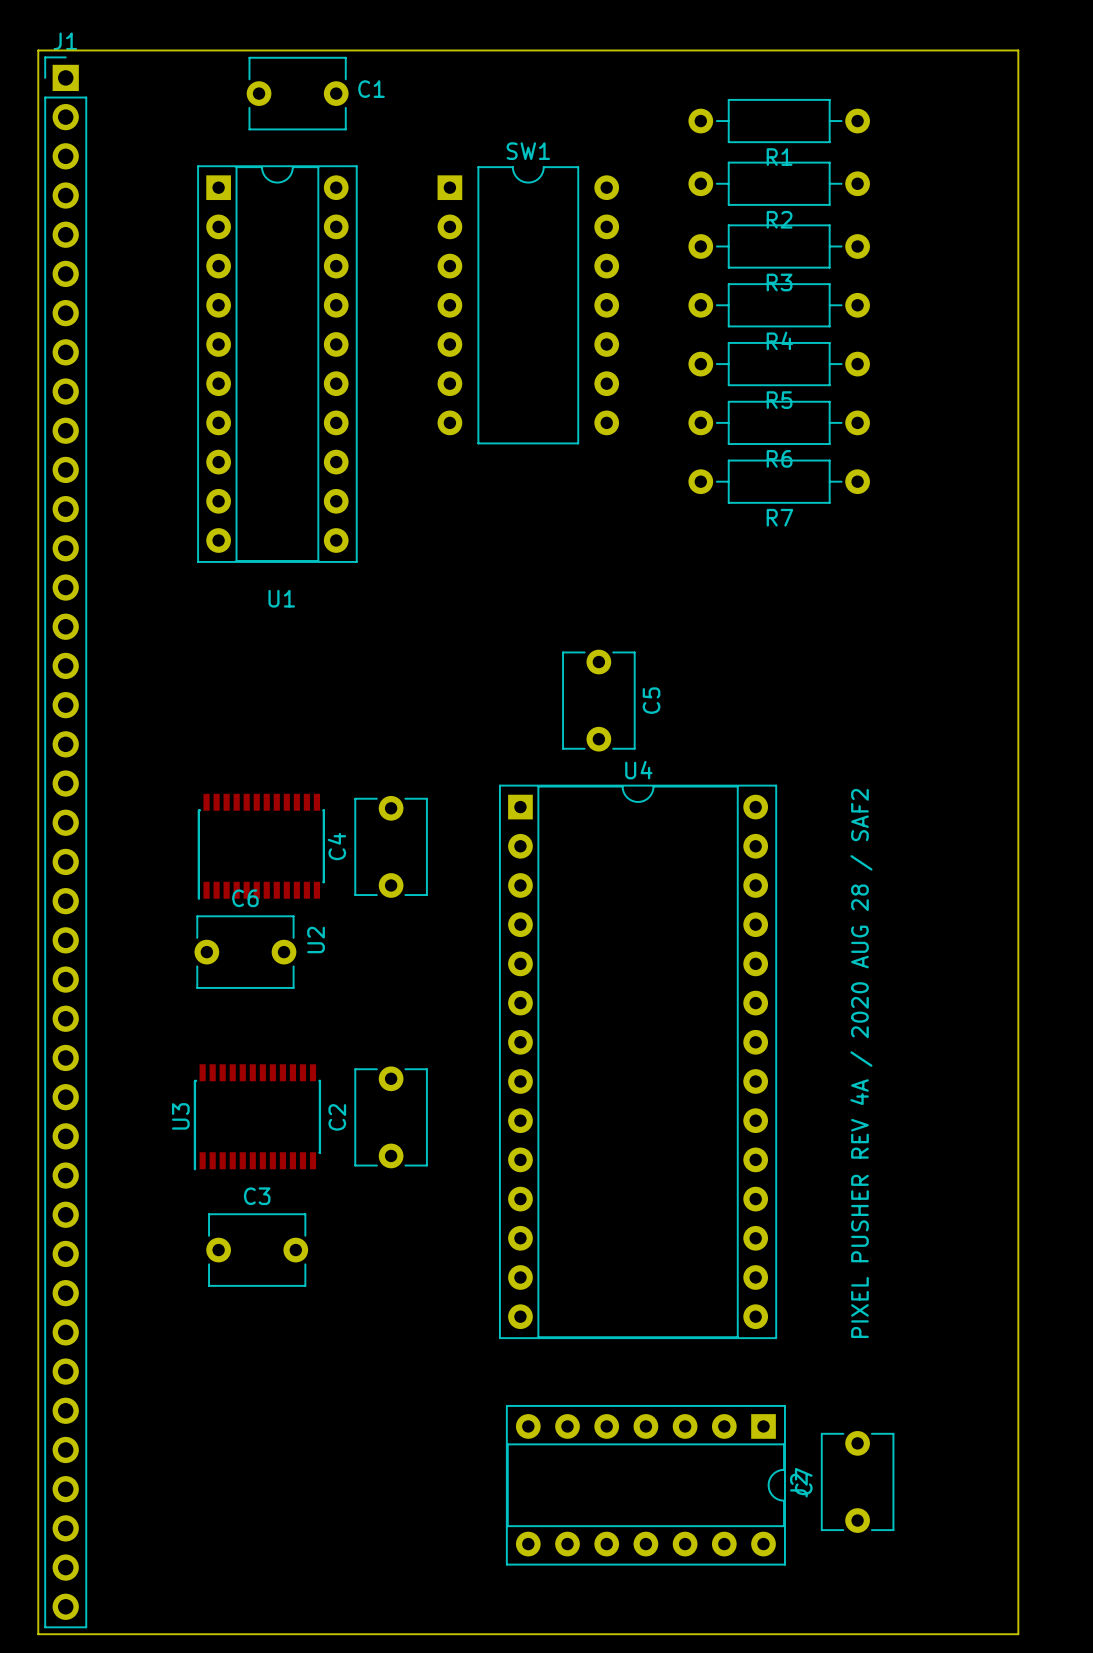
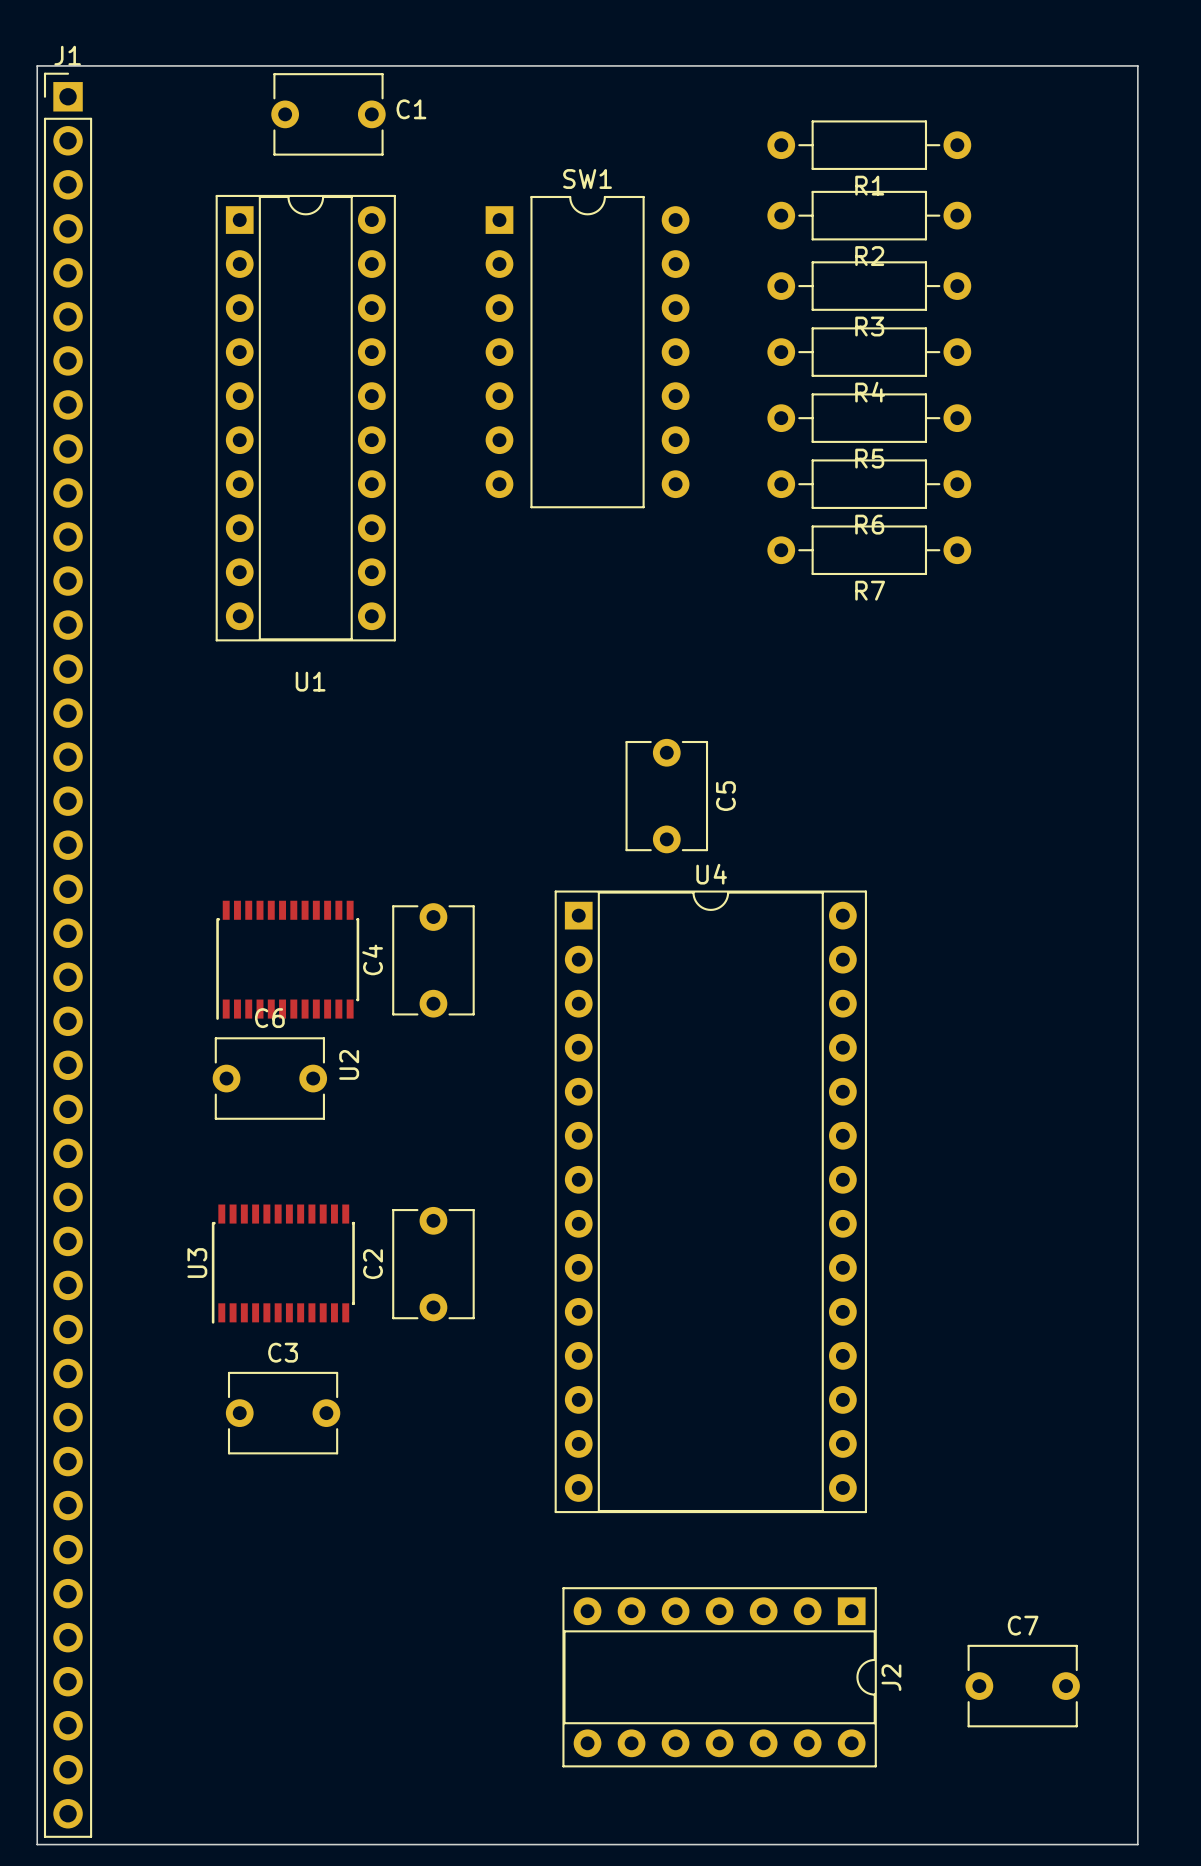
text: PIXEL PUSHER REV 4A / 2020 AUG 28 / SAF2 (861, 1063) -> none
C7 rotation: 0° (857, 1481) -> 90° clockwise (1022, 1686)

